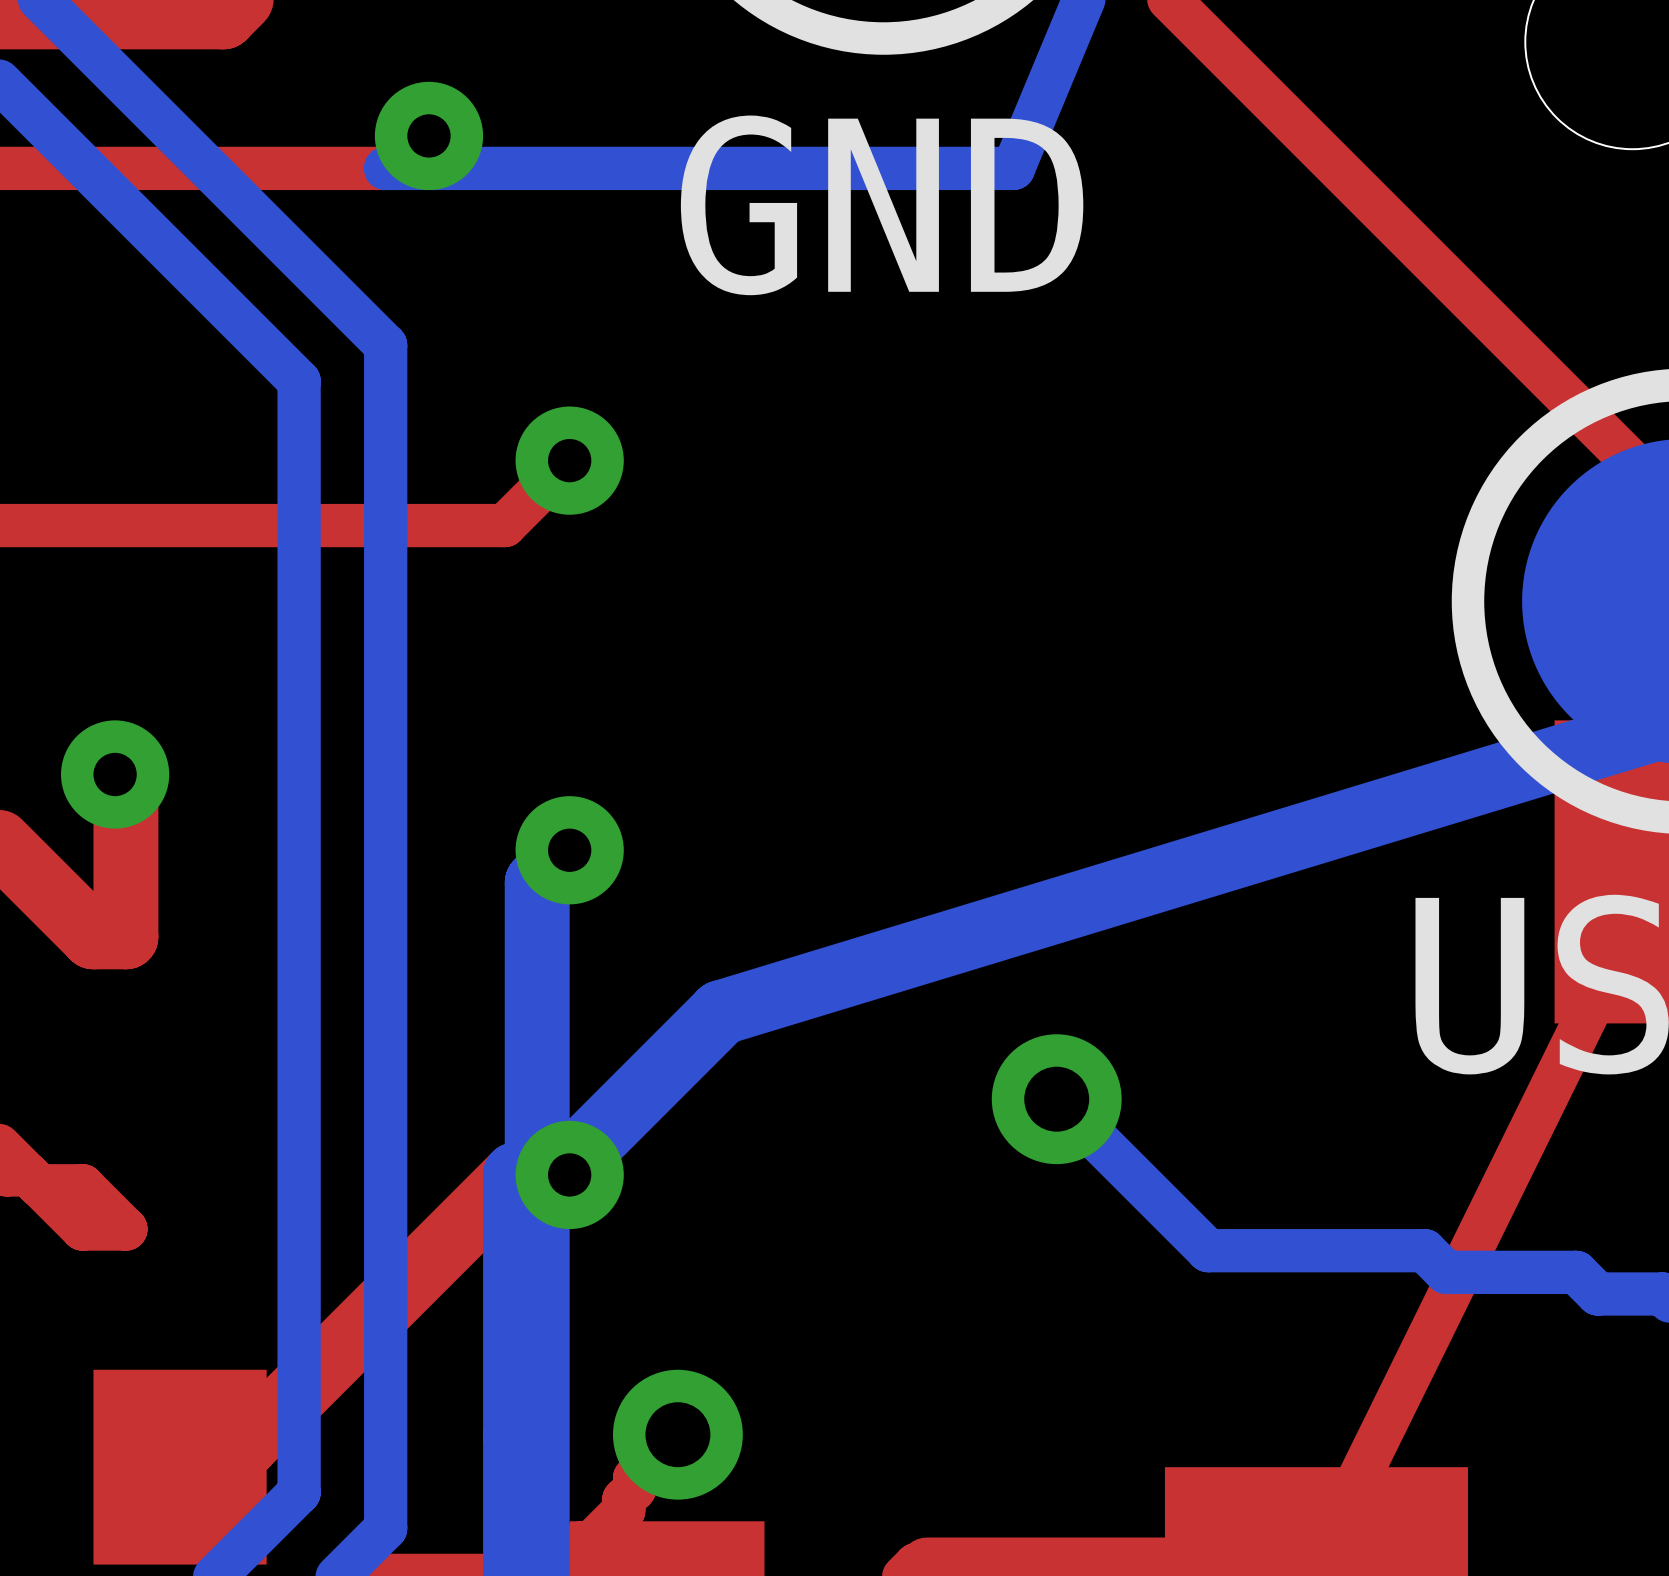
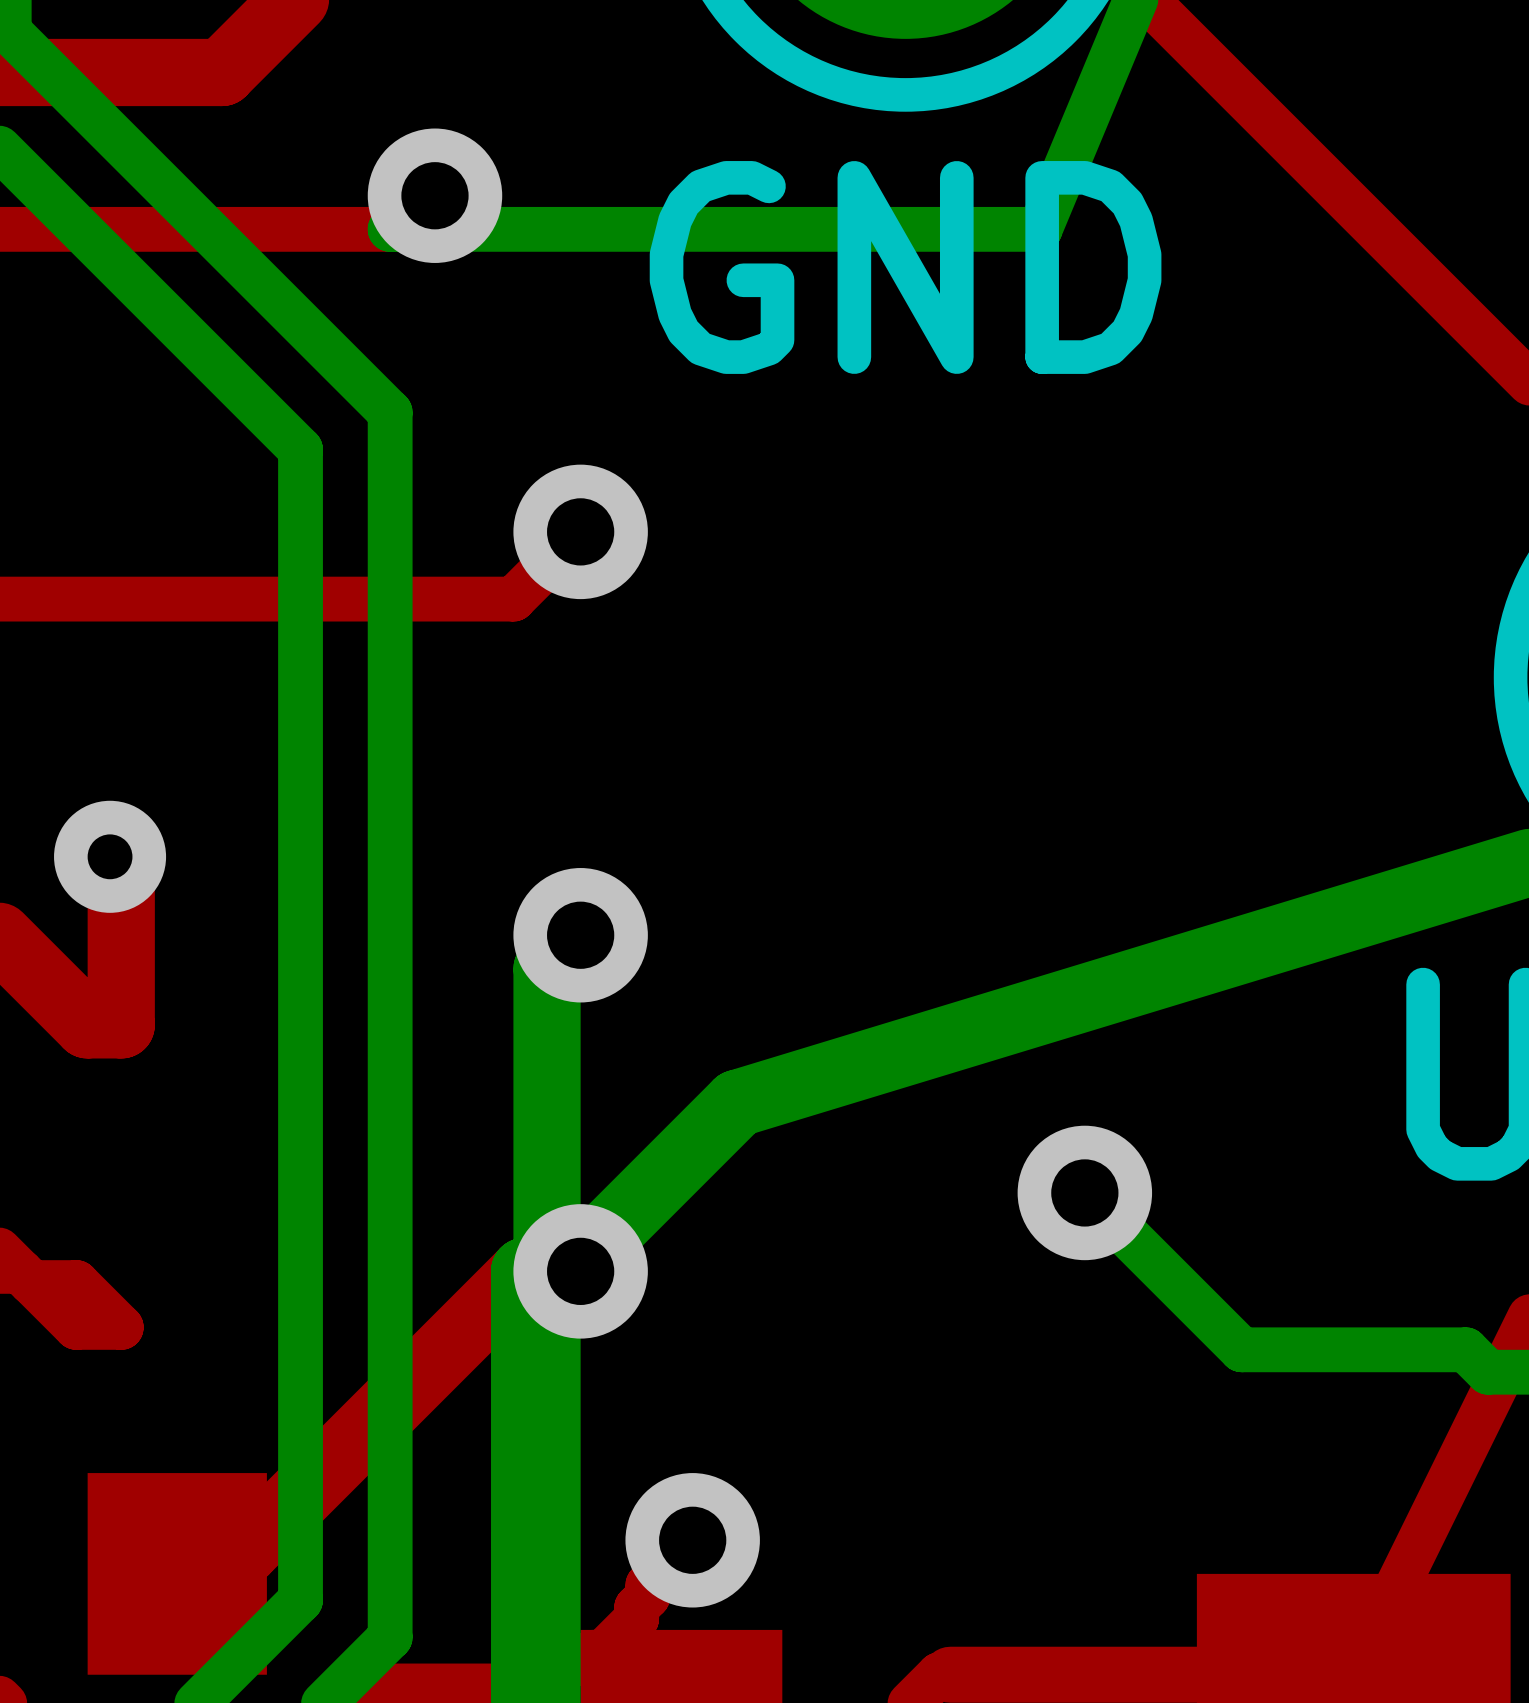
via size: [374, 81, 484, 191] -> [367, 128, 503, 263]
via size: [515, 406, 624, 515] -> [513, 464, 648, 600]
via size: [515, 796, 624, 905] -> [513, 868, 648, 1003]
via size: [515, 1120, 624, 1230] -> [513, 1204, 648, 1339]

